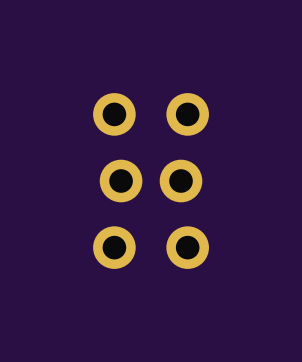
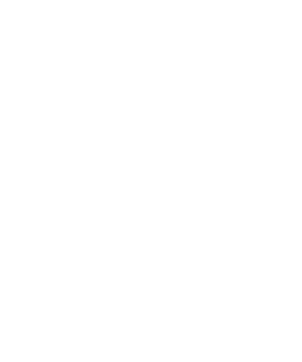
part: (151, 181) -> none

